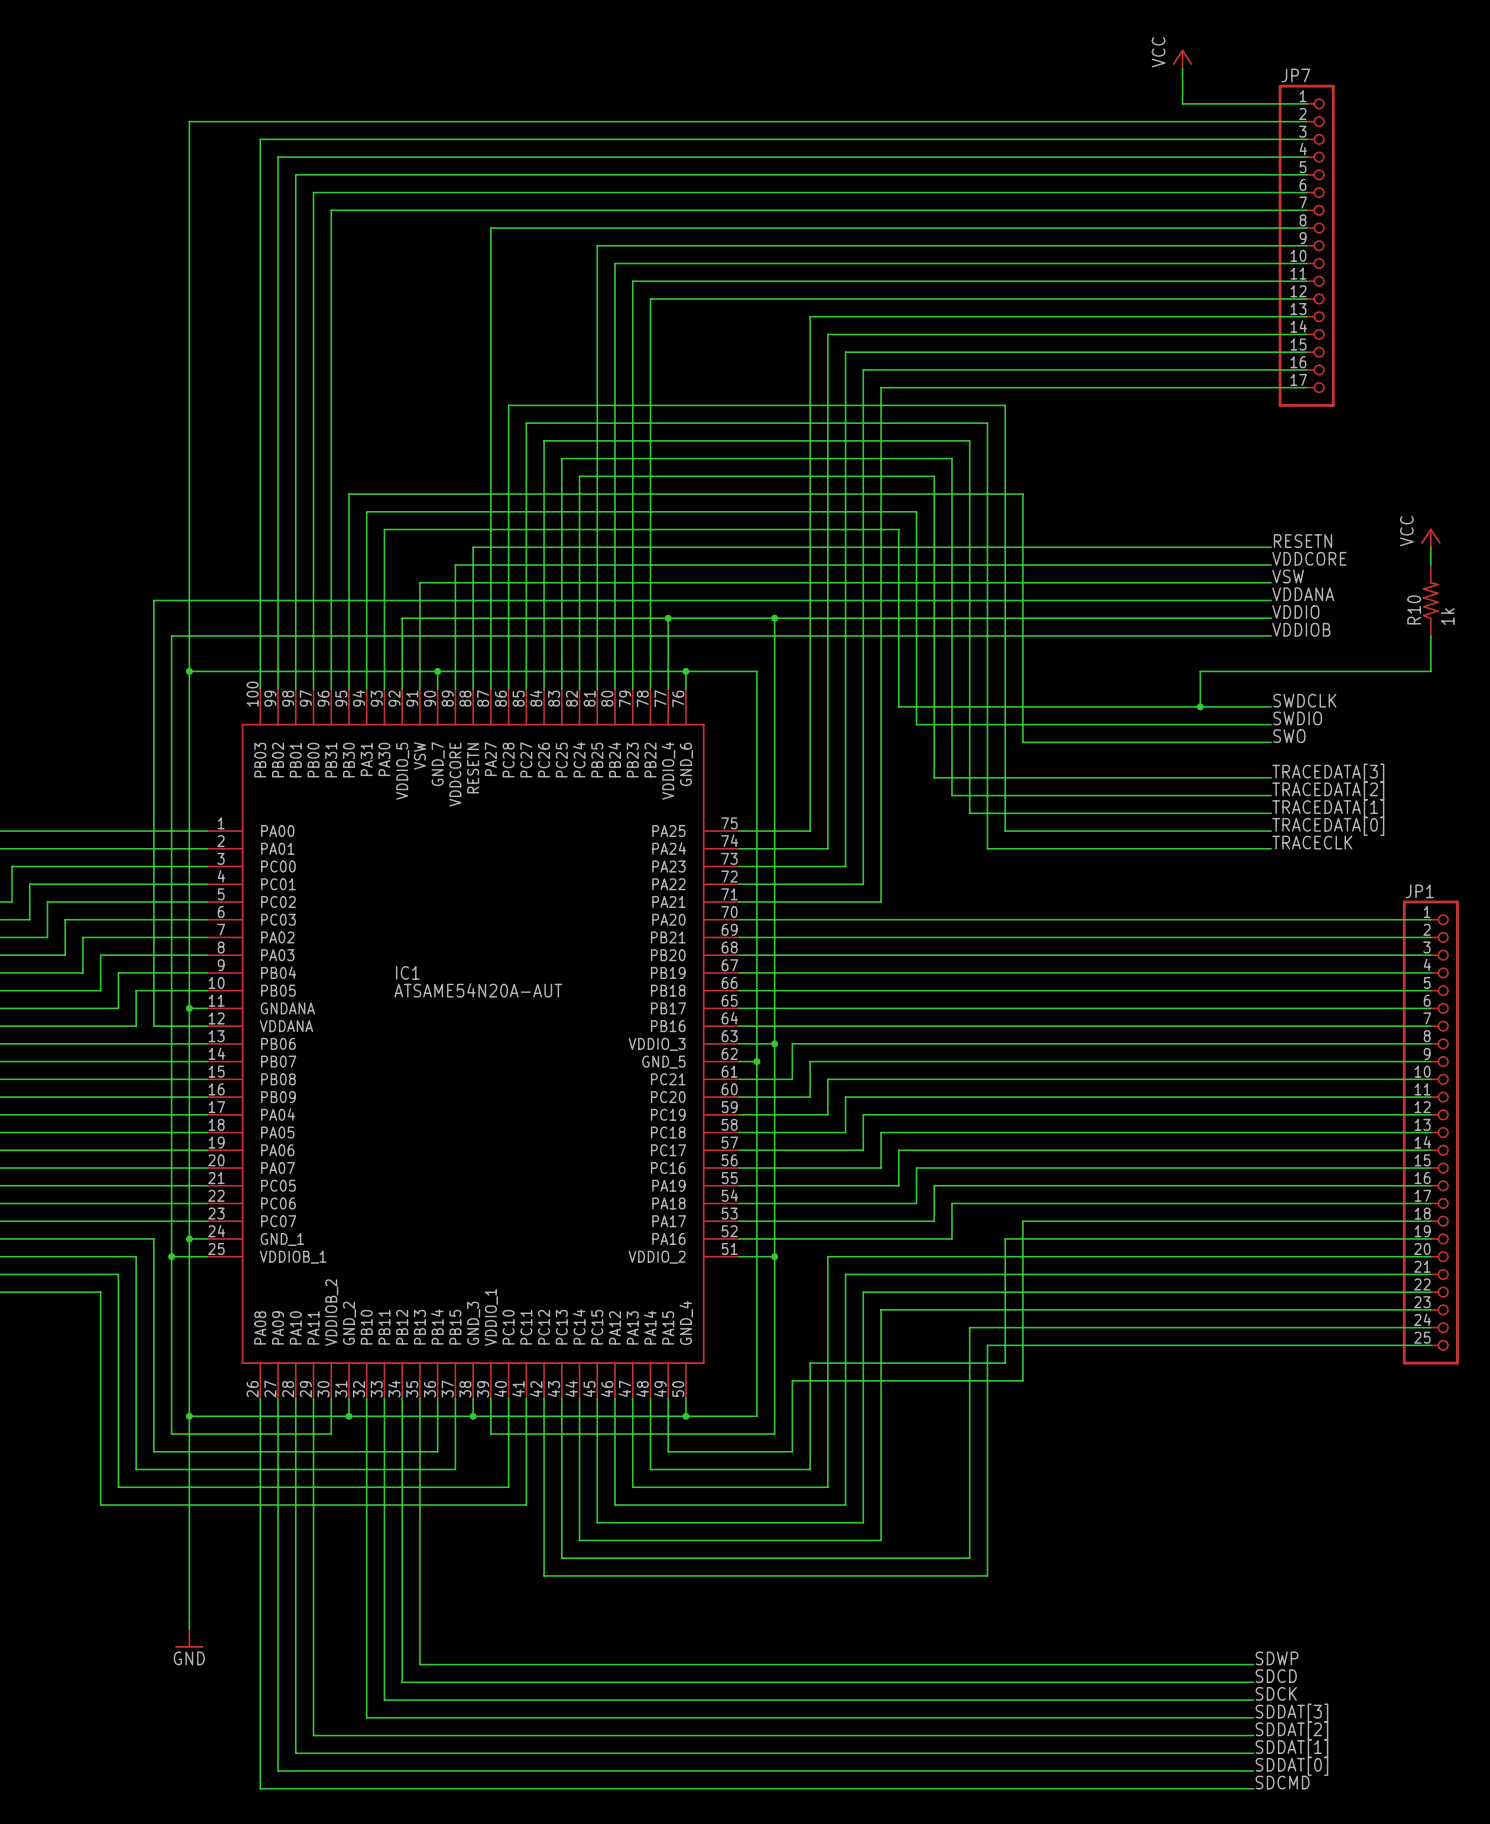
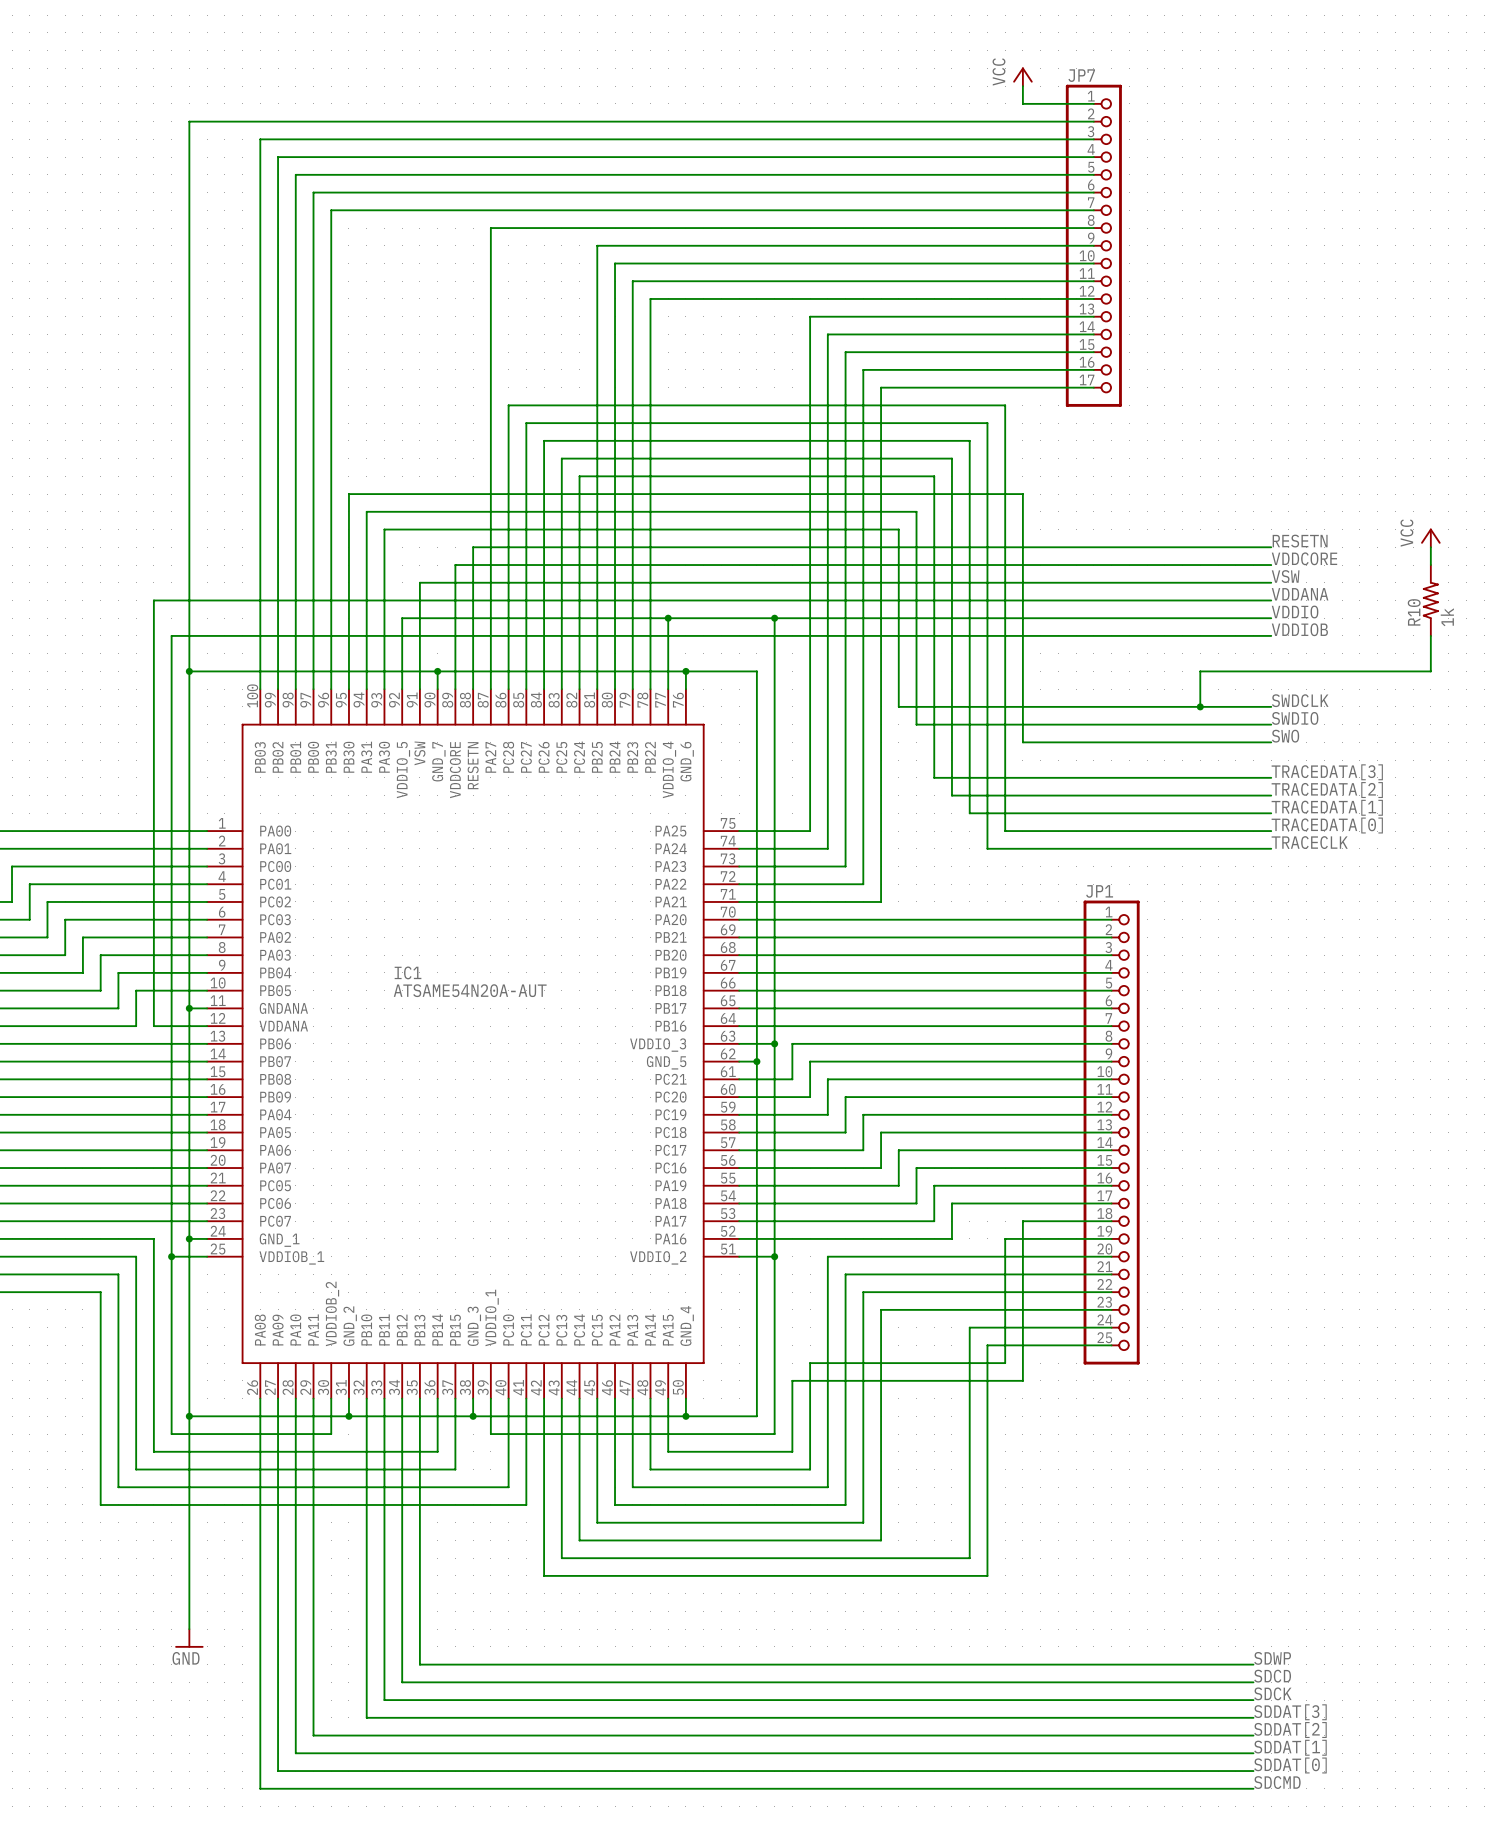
power symbol position: VCC (1182, 59) -> VCC (1022, 76)
wire: (1182, 68) (1182, 103) (1306, 103) -> none
wire: none -> (1022, 86) (1022, 103) (1093, 103)
wire: (1093, 121) (1306, 121) -> none
wire: (1093, 139) (1306, 139) -> none
wire: (1093, 157) (1306, 157) -> none
wire: (1093, 174) (1306, 174) -> none
wire: (1093, 192) (1306, 192) -> none
wire: (1093, 210) (1306, 210) -> none
wire: (1093, 228) (1306, 228) -> none
wire: (1093, 245) (1306, 245) -> none
JP7 position: (1306, 245) -> (1093, 245)
wire: (1093, 263) (1306, 263) -> none
wire: (1093, 281) (1306, 281) -> none
wire: (1093, 298) (1306, 298) -> none
wire: (1093, 316) (1306, 316) -> none
wire: (1093, 334) (1306, 334) -> none
wire: (1093, 352) (1306, 352) -> none
wire: (1093, 369) (1306, 369) -> none
wire: (1093, 387) (1306, 387) -> none
wire: (1111, 919) (1430, 919) -> none
wire: (1111, 937) (1430, 937) -> none
wire: (1111, 955) (1430, 955) -> none
wire: (1111, 972) (1430, 972) -> none
wire: (1111, 990) (1430, 990) -> none
wire: (1111, 1008) (1430, 1008) -> none
wire: (1111, 1026) (1430, 1026) -> none
wire: (1111, 1043) (1430, 1043) -> none
wire: (1111, 1061) (1430, 1061) -> none
wire: (1111, 1079) (1430, 1079) -> none
wire: (1111, 1097) (1430, 1097) -> none
wire: (1111, 1114) (1430, 1114) -> none
wire: (1111, 1132) (1430, 1132) -> none
JP1 position: (1430, 1132) -> (1111, 1132)
wire: (1111, 1150) (1430, 1150) -> none
wire: (1111, 1168) (1430, 1168) -> none
wire: (1111, 1185) (1430, 1185) -> none
wire: (1111, 1203) (1430, 1203) -> none
wire: (1111, 1221) (1430, 1221) -> none
wire: (1111, 1238) (1430, 1238) -> none
wire: (1111, 1256) (1430, 1256) -> none
wire: (1111, 1274) (1430, 1274) -> none
wire: (1111, 1292) (1430, 1292) -> none
wire: (1111, 1309) (1430, 1309) -> none
wire: (1111, 1327) (1430, 1327) -> none
wire: (1111, 1345) (1430, 1345) -> none

